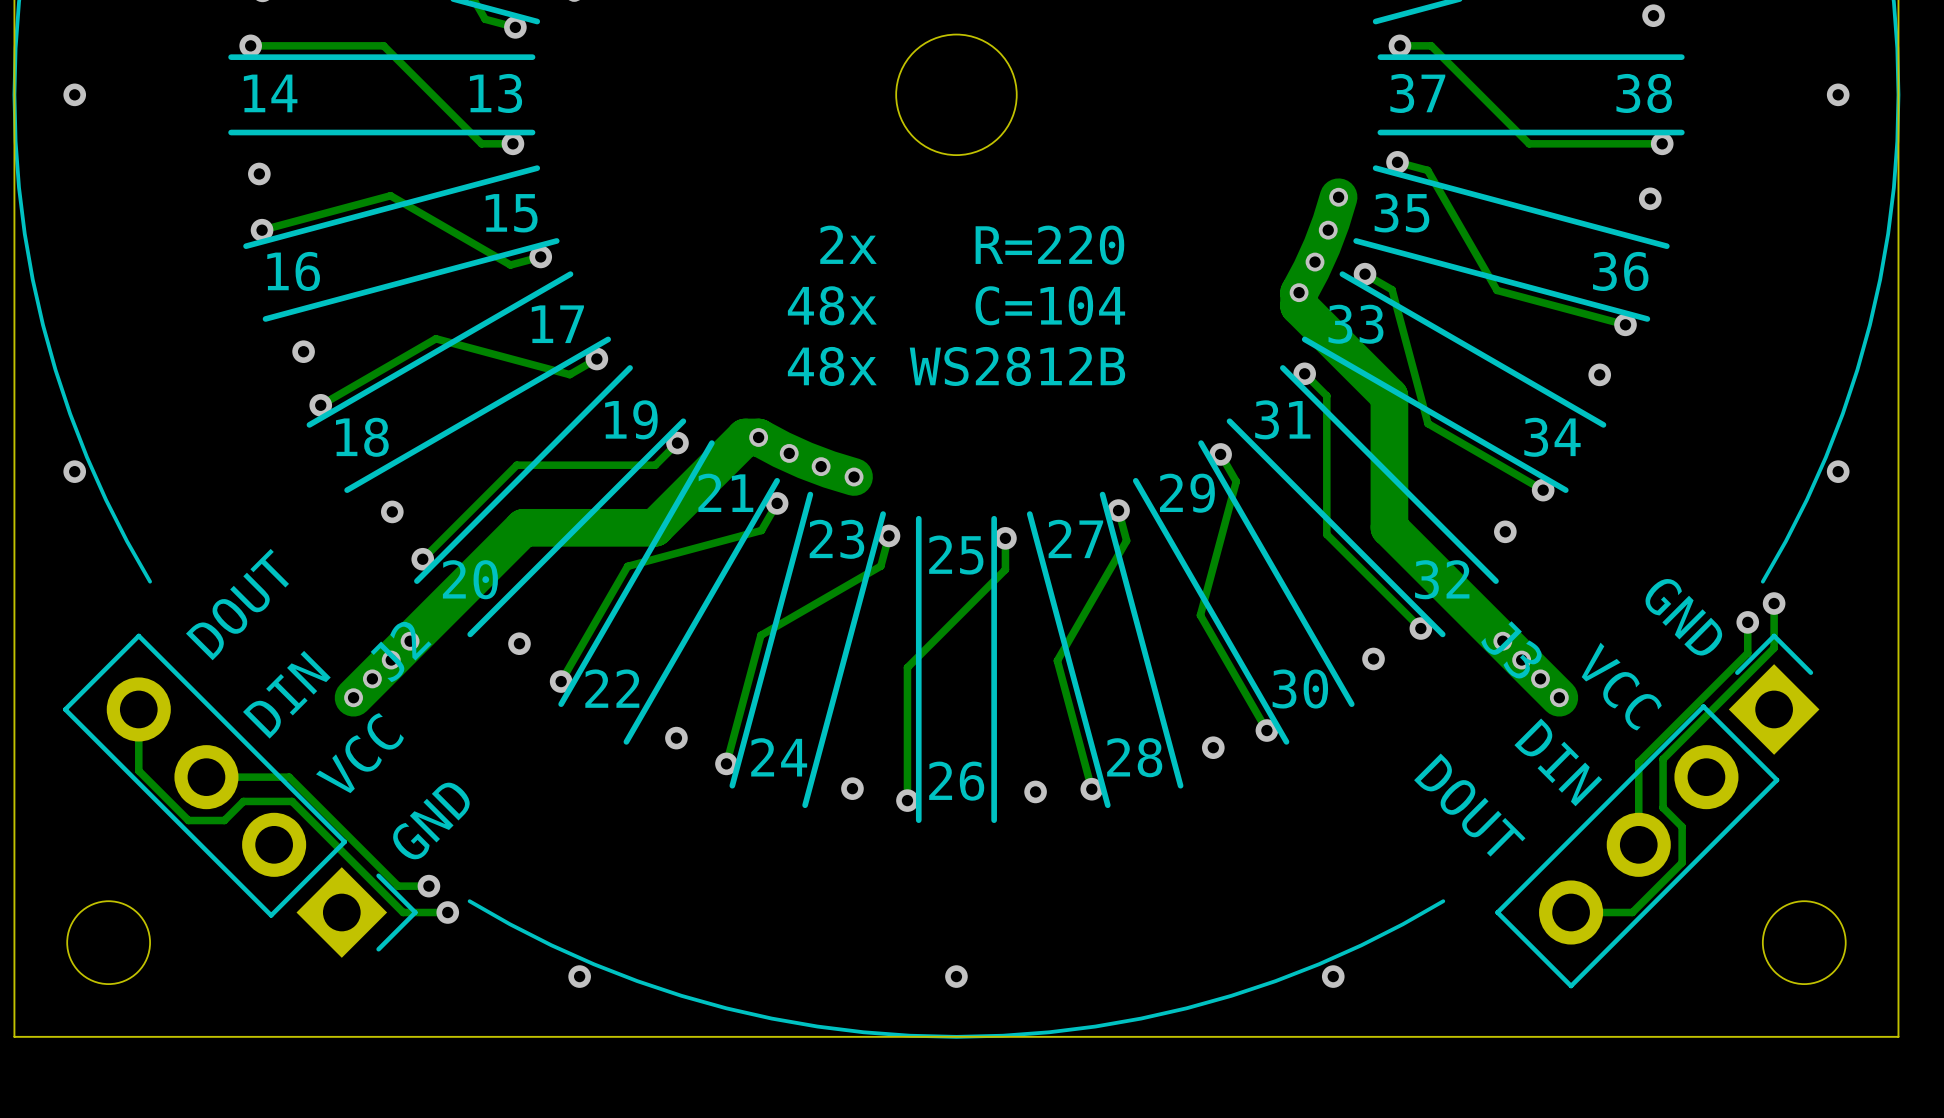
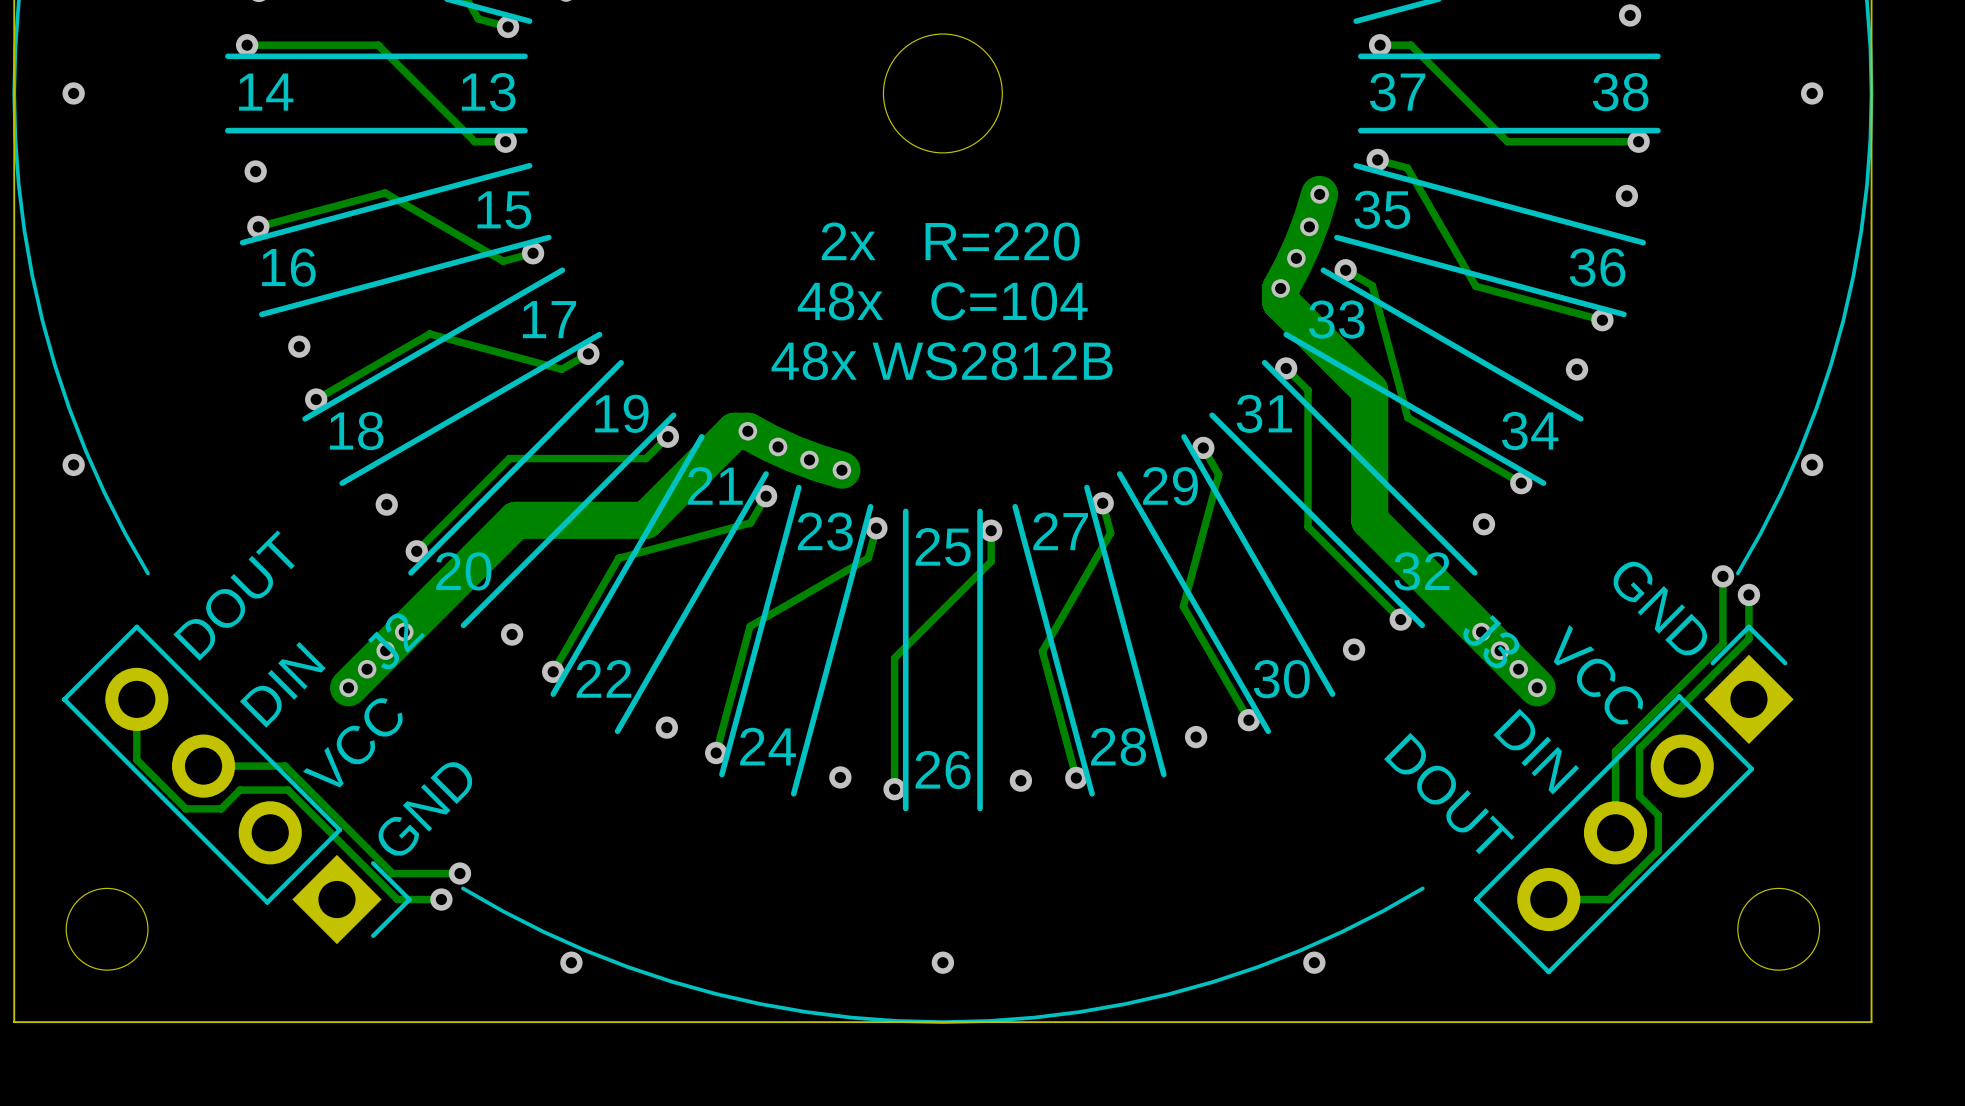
track: none -> (1722, 576) (1722, 613)
via position: (1747, 622) -> (1722, 576)
via position: (428, 886) -> (459, 873)
track: none -> (459, 873) (422, 873)

